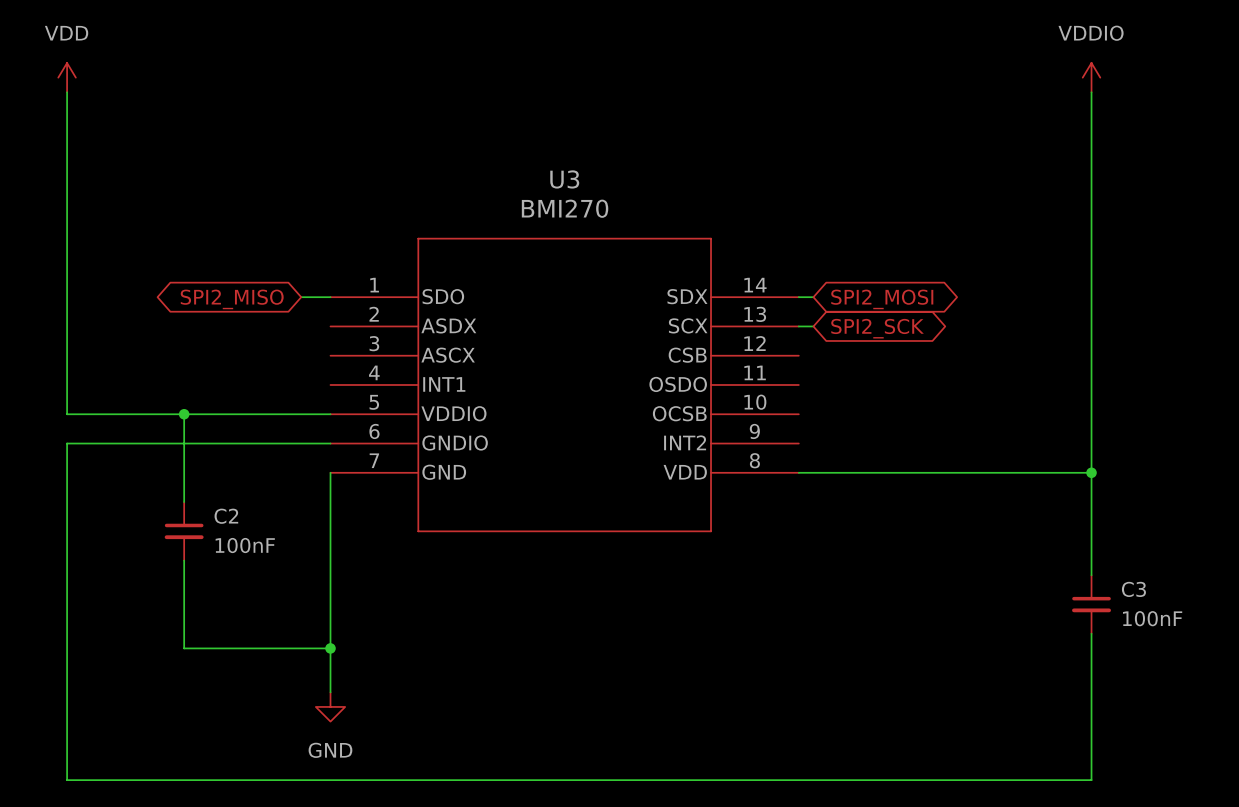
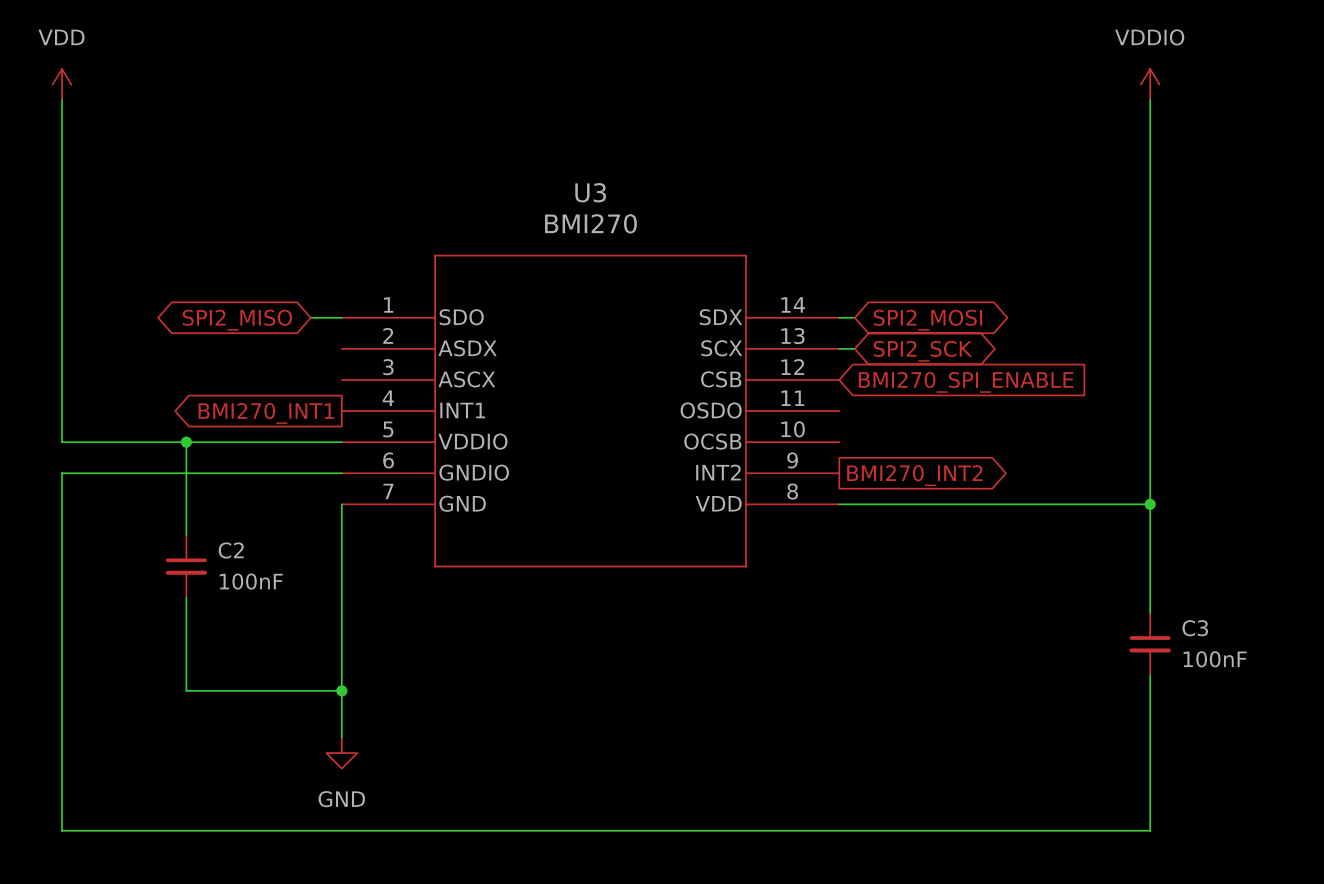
global label: none -> BMI270_SPI_ENABLE (966, 382)
global label: none -> BMI270_INT1 (266, 413)
global label: none -> BMI270_INT2 (914, 475)

